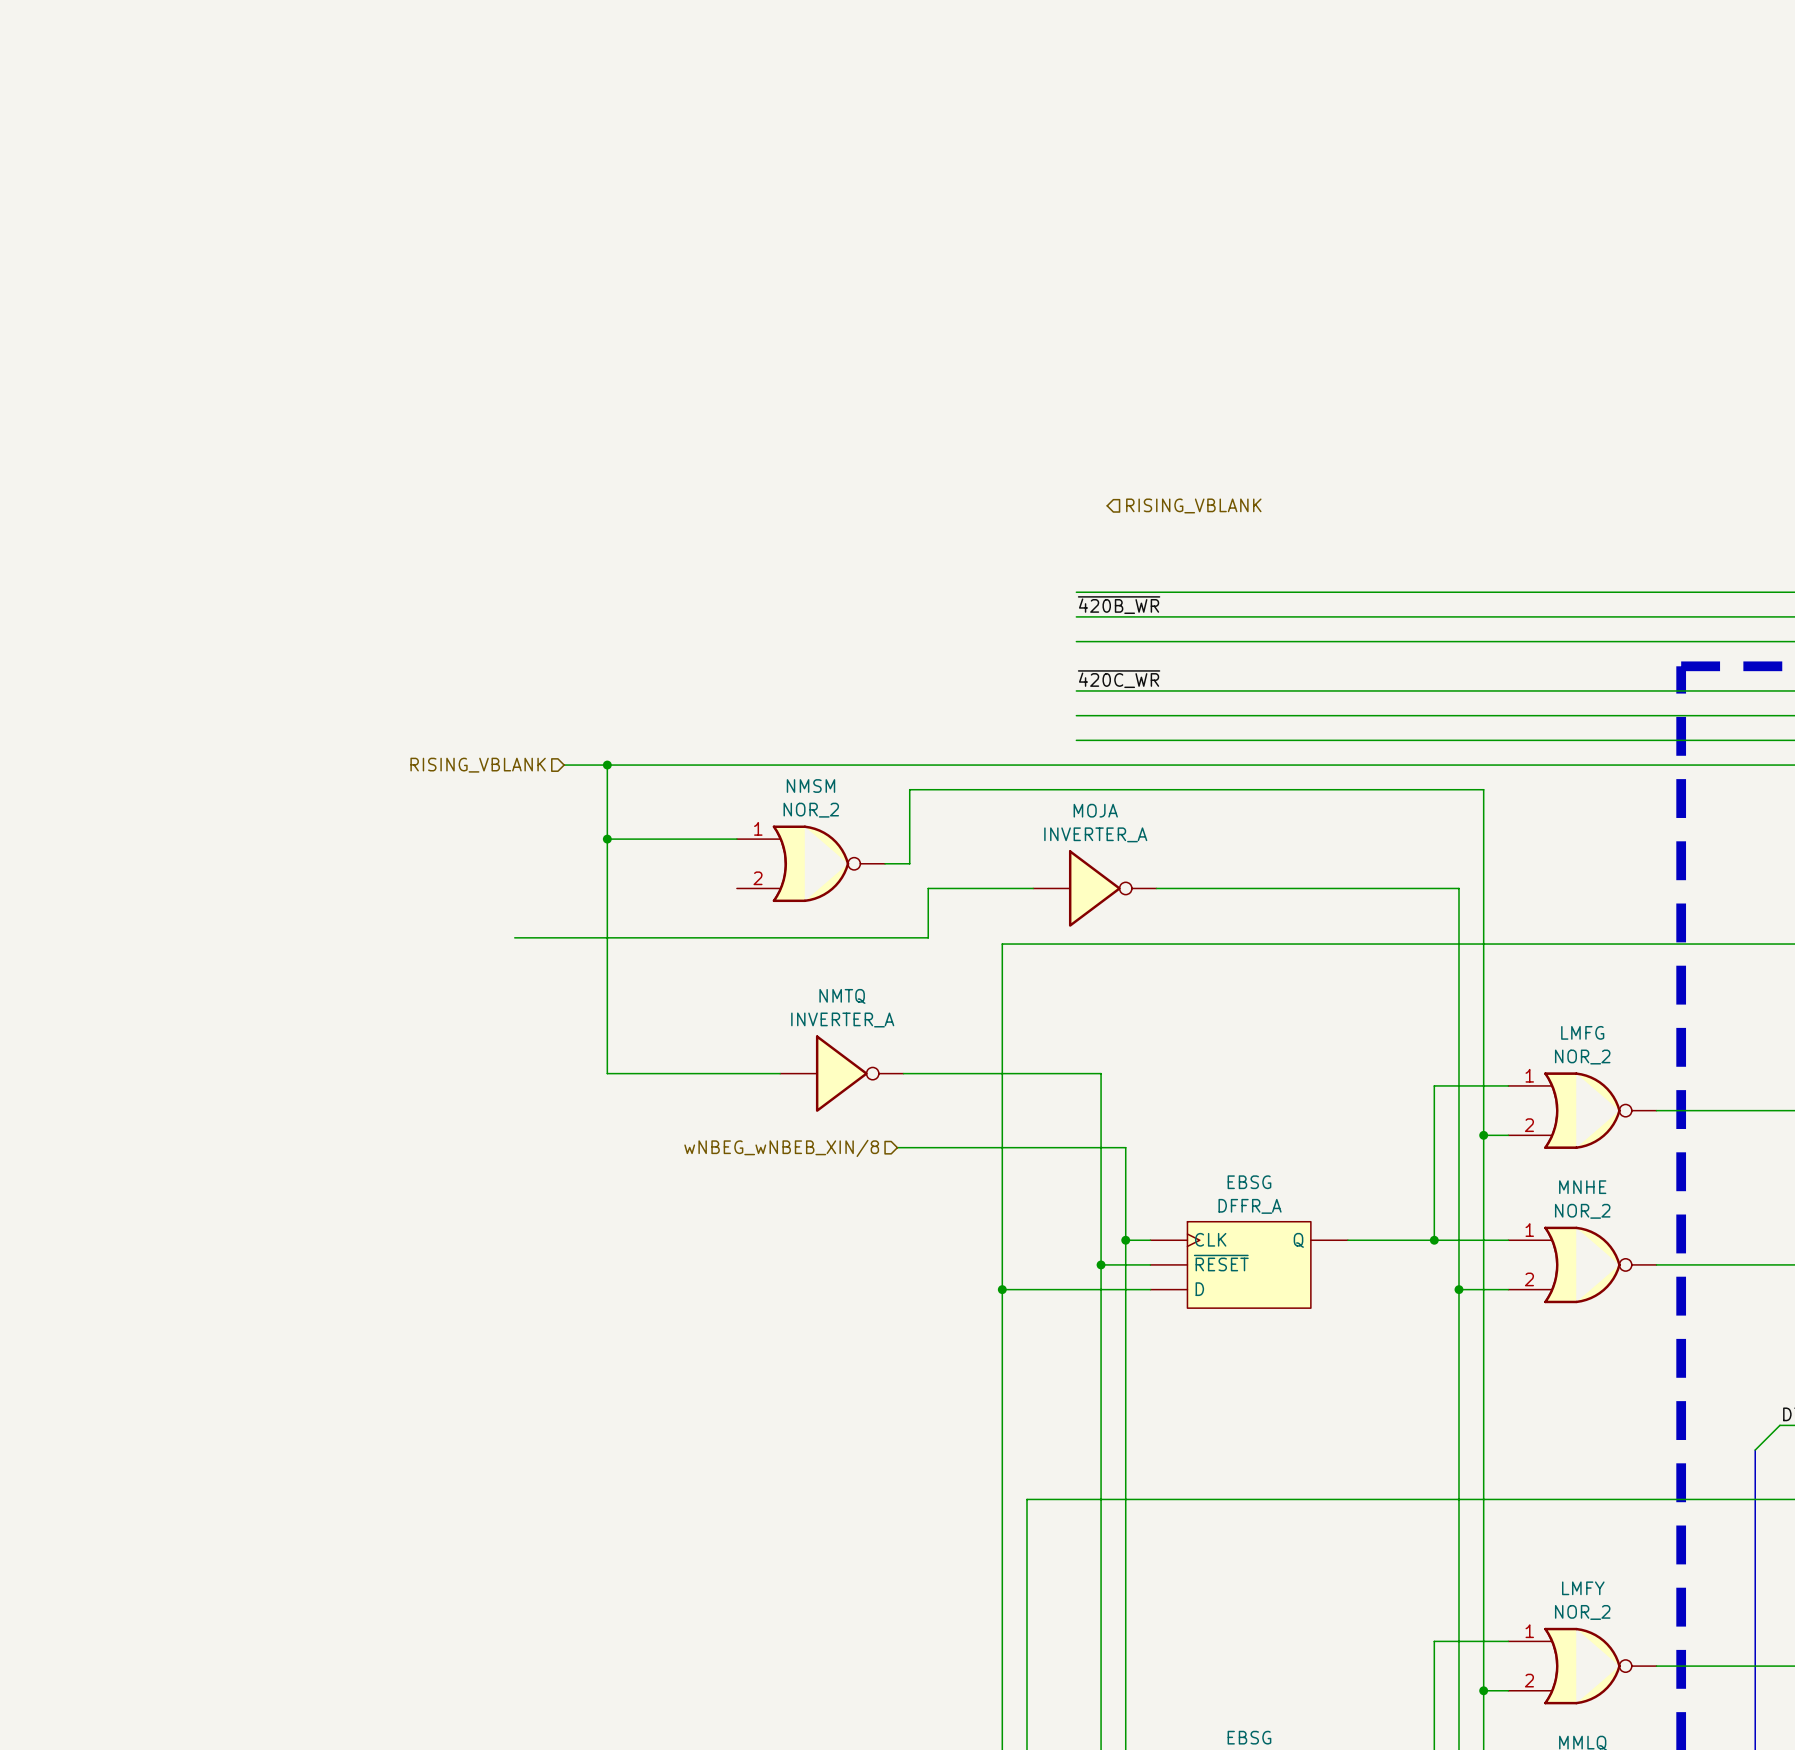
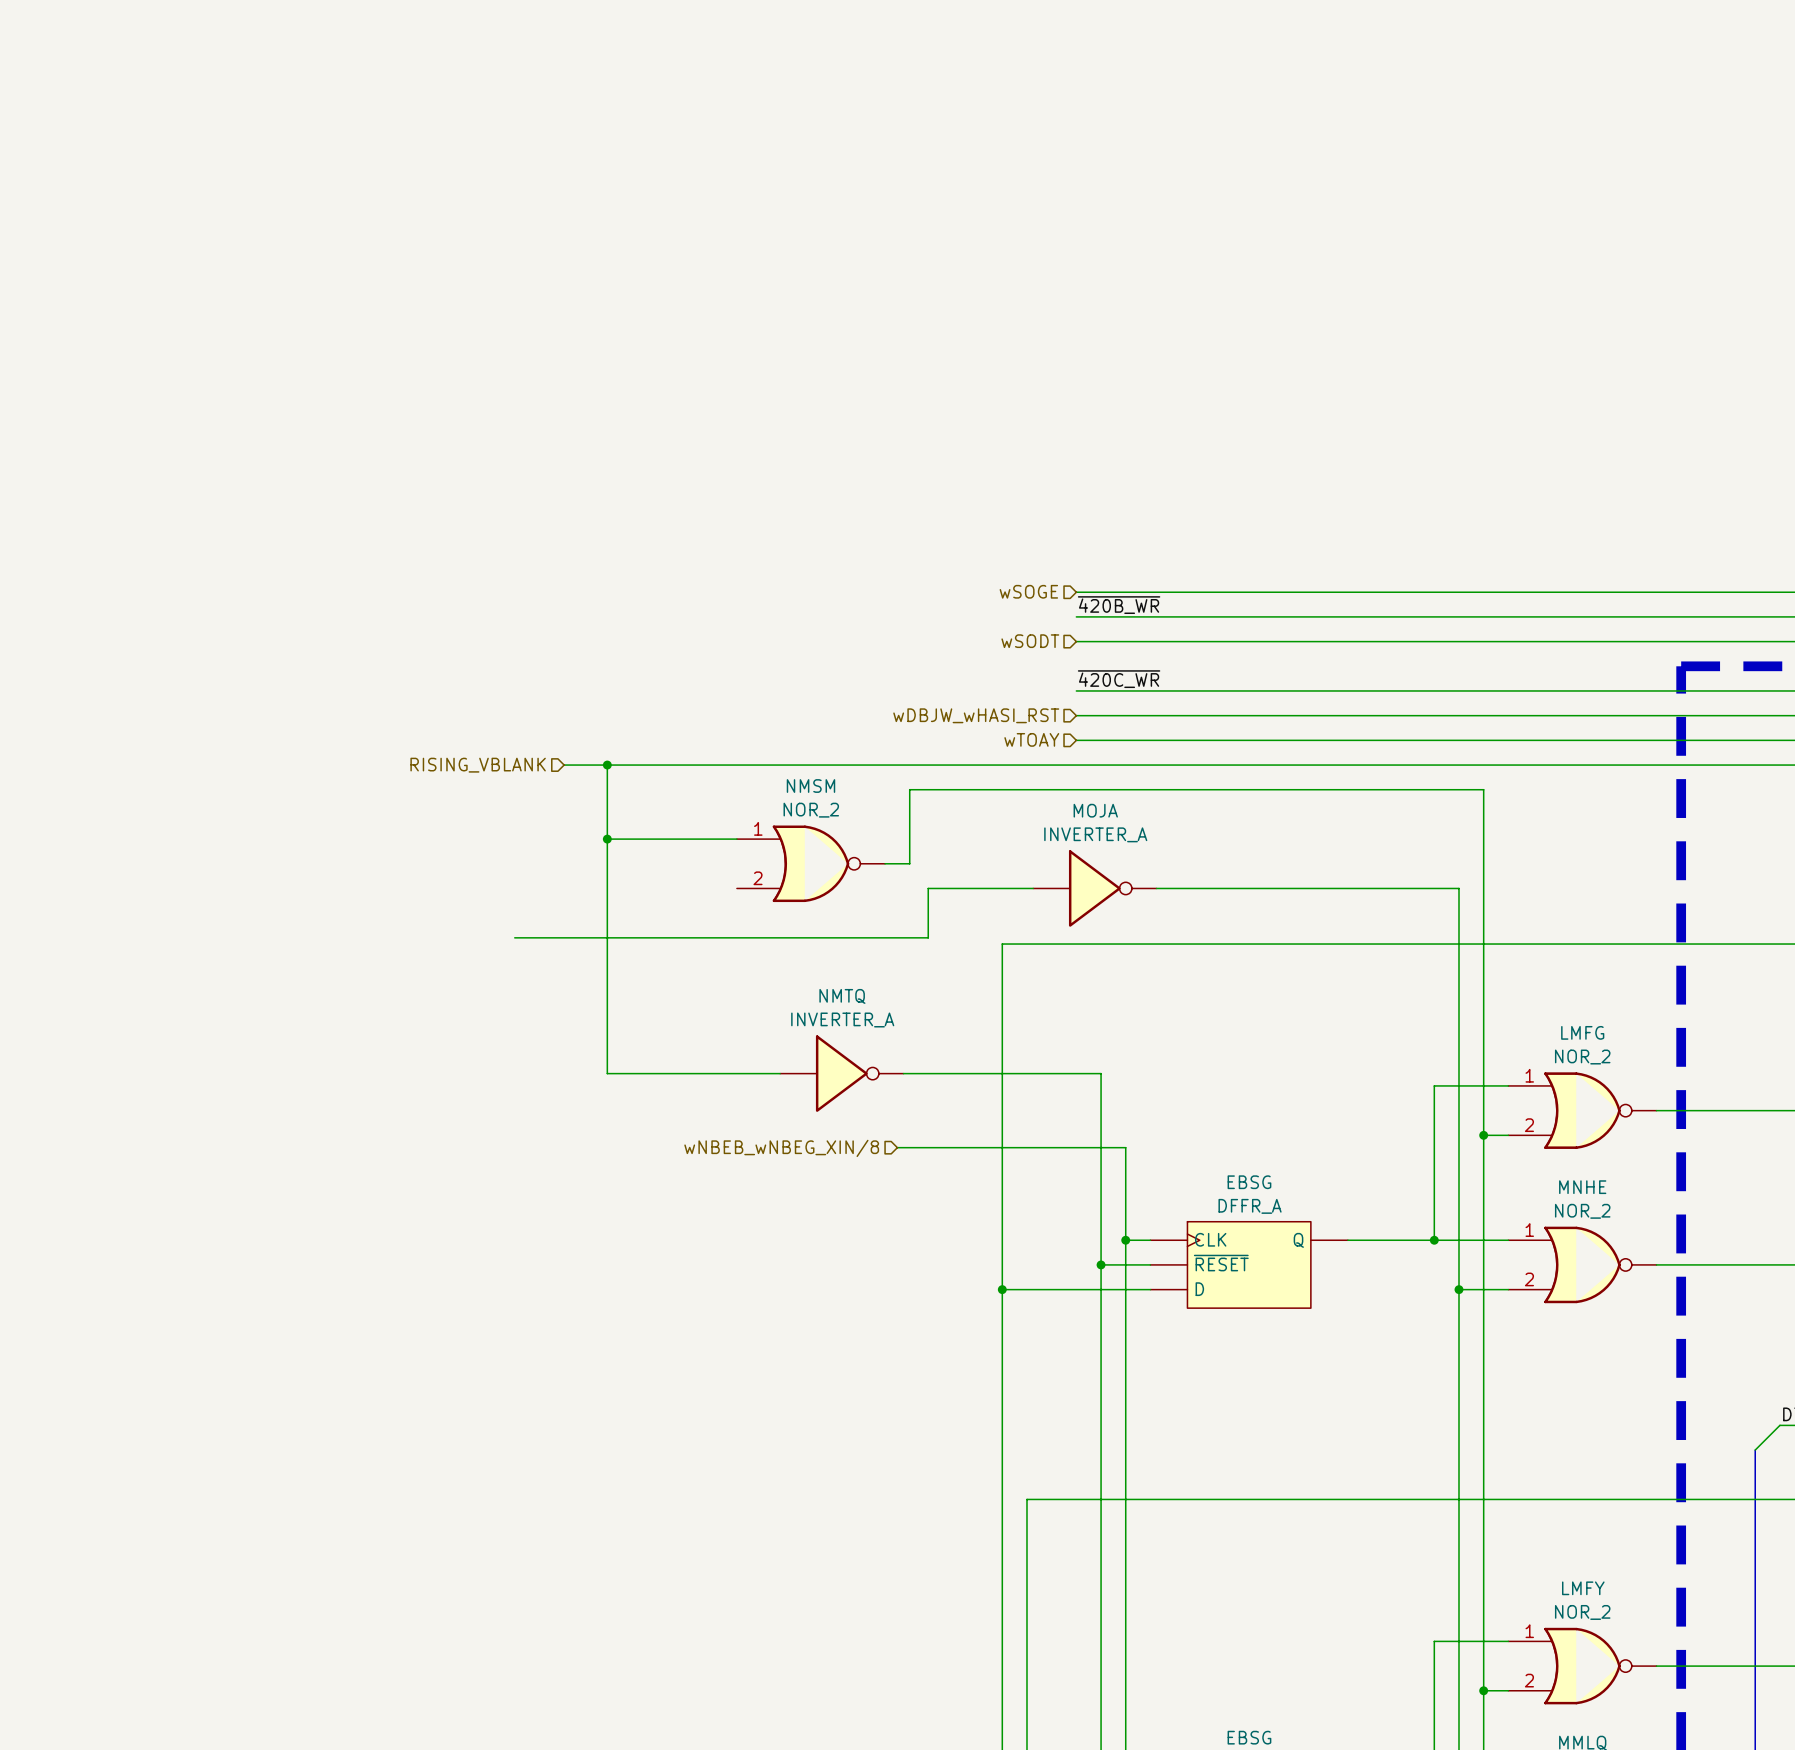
hierarchical label: RISING_VBLANK (1193, 505) -> none
hierarchical label: none -> wSOGE (1028, 591)
hierarchical label: none -> wSODT (1030, 641)
hierarchical label: none -> wDBJW_wHASI_RST (976, 715)
hierarchical label: none -> wTOAY (1031, 739)
hierarchical label: wNBEG_wNBEB_XIN/8 (781, 1148) -> wNBEB_wNBEG_XIN/8 (781, 1148)

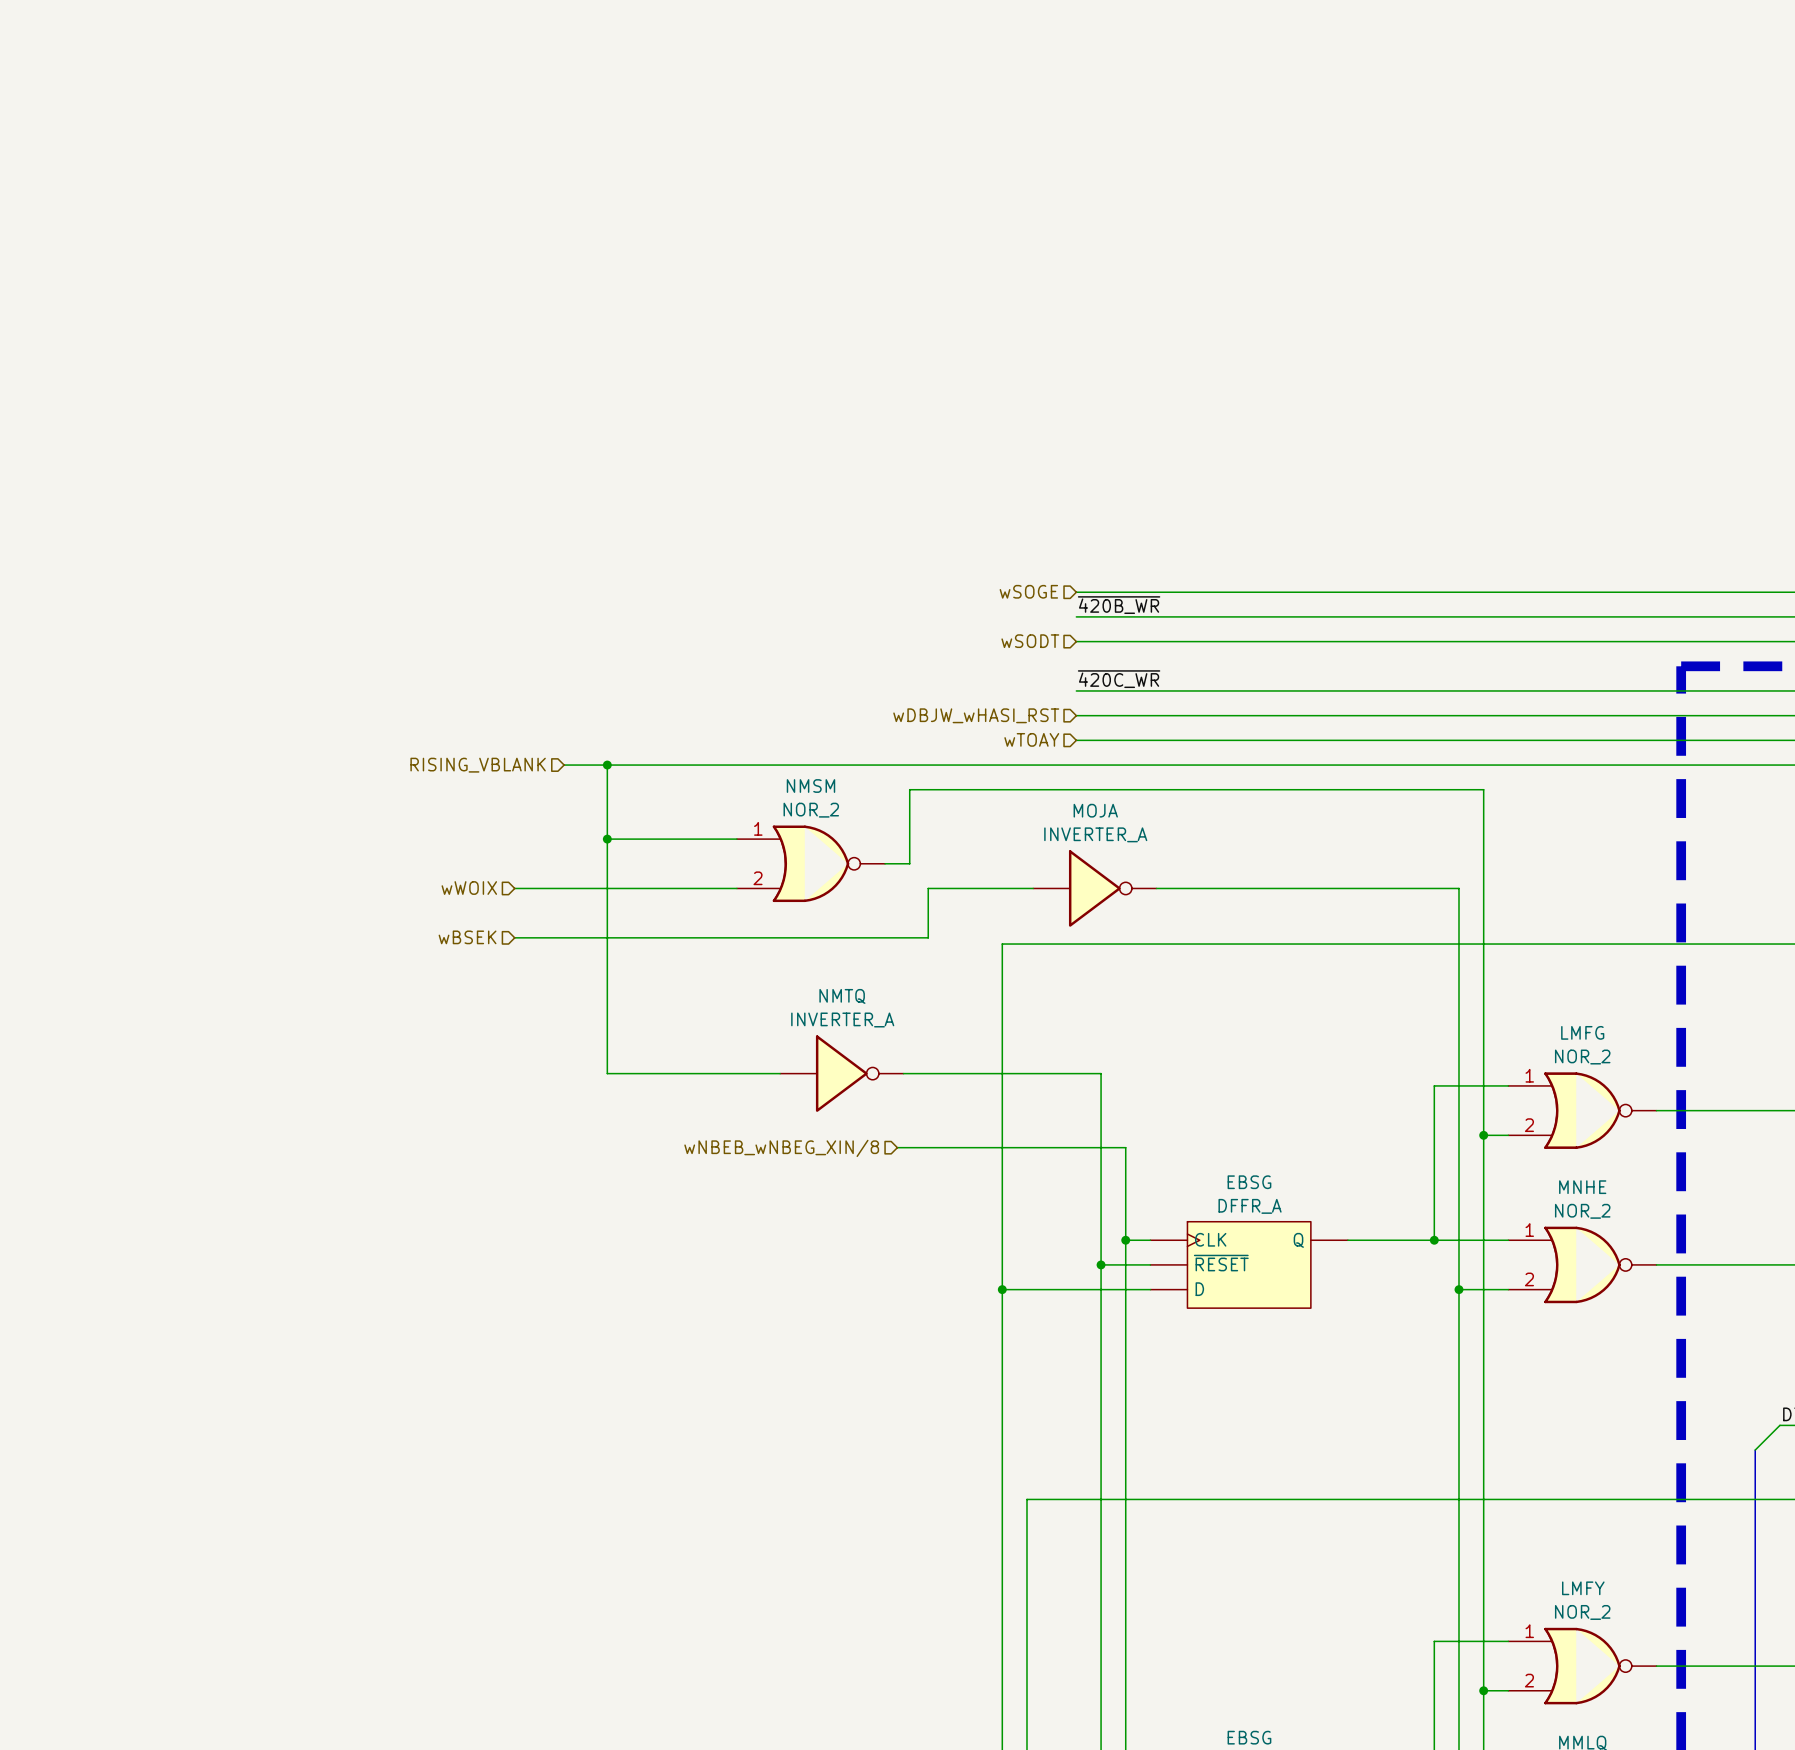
hierarchical label: none -> wWOIX (469, 888)
wire: none -> (514, 888) (736, 888)
hierarchical label: none -> wBSEK (467, 937)

